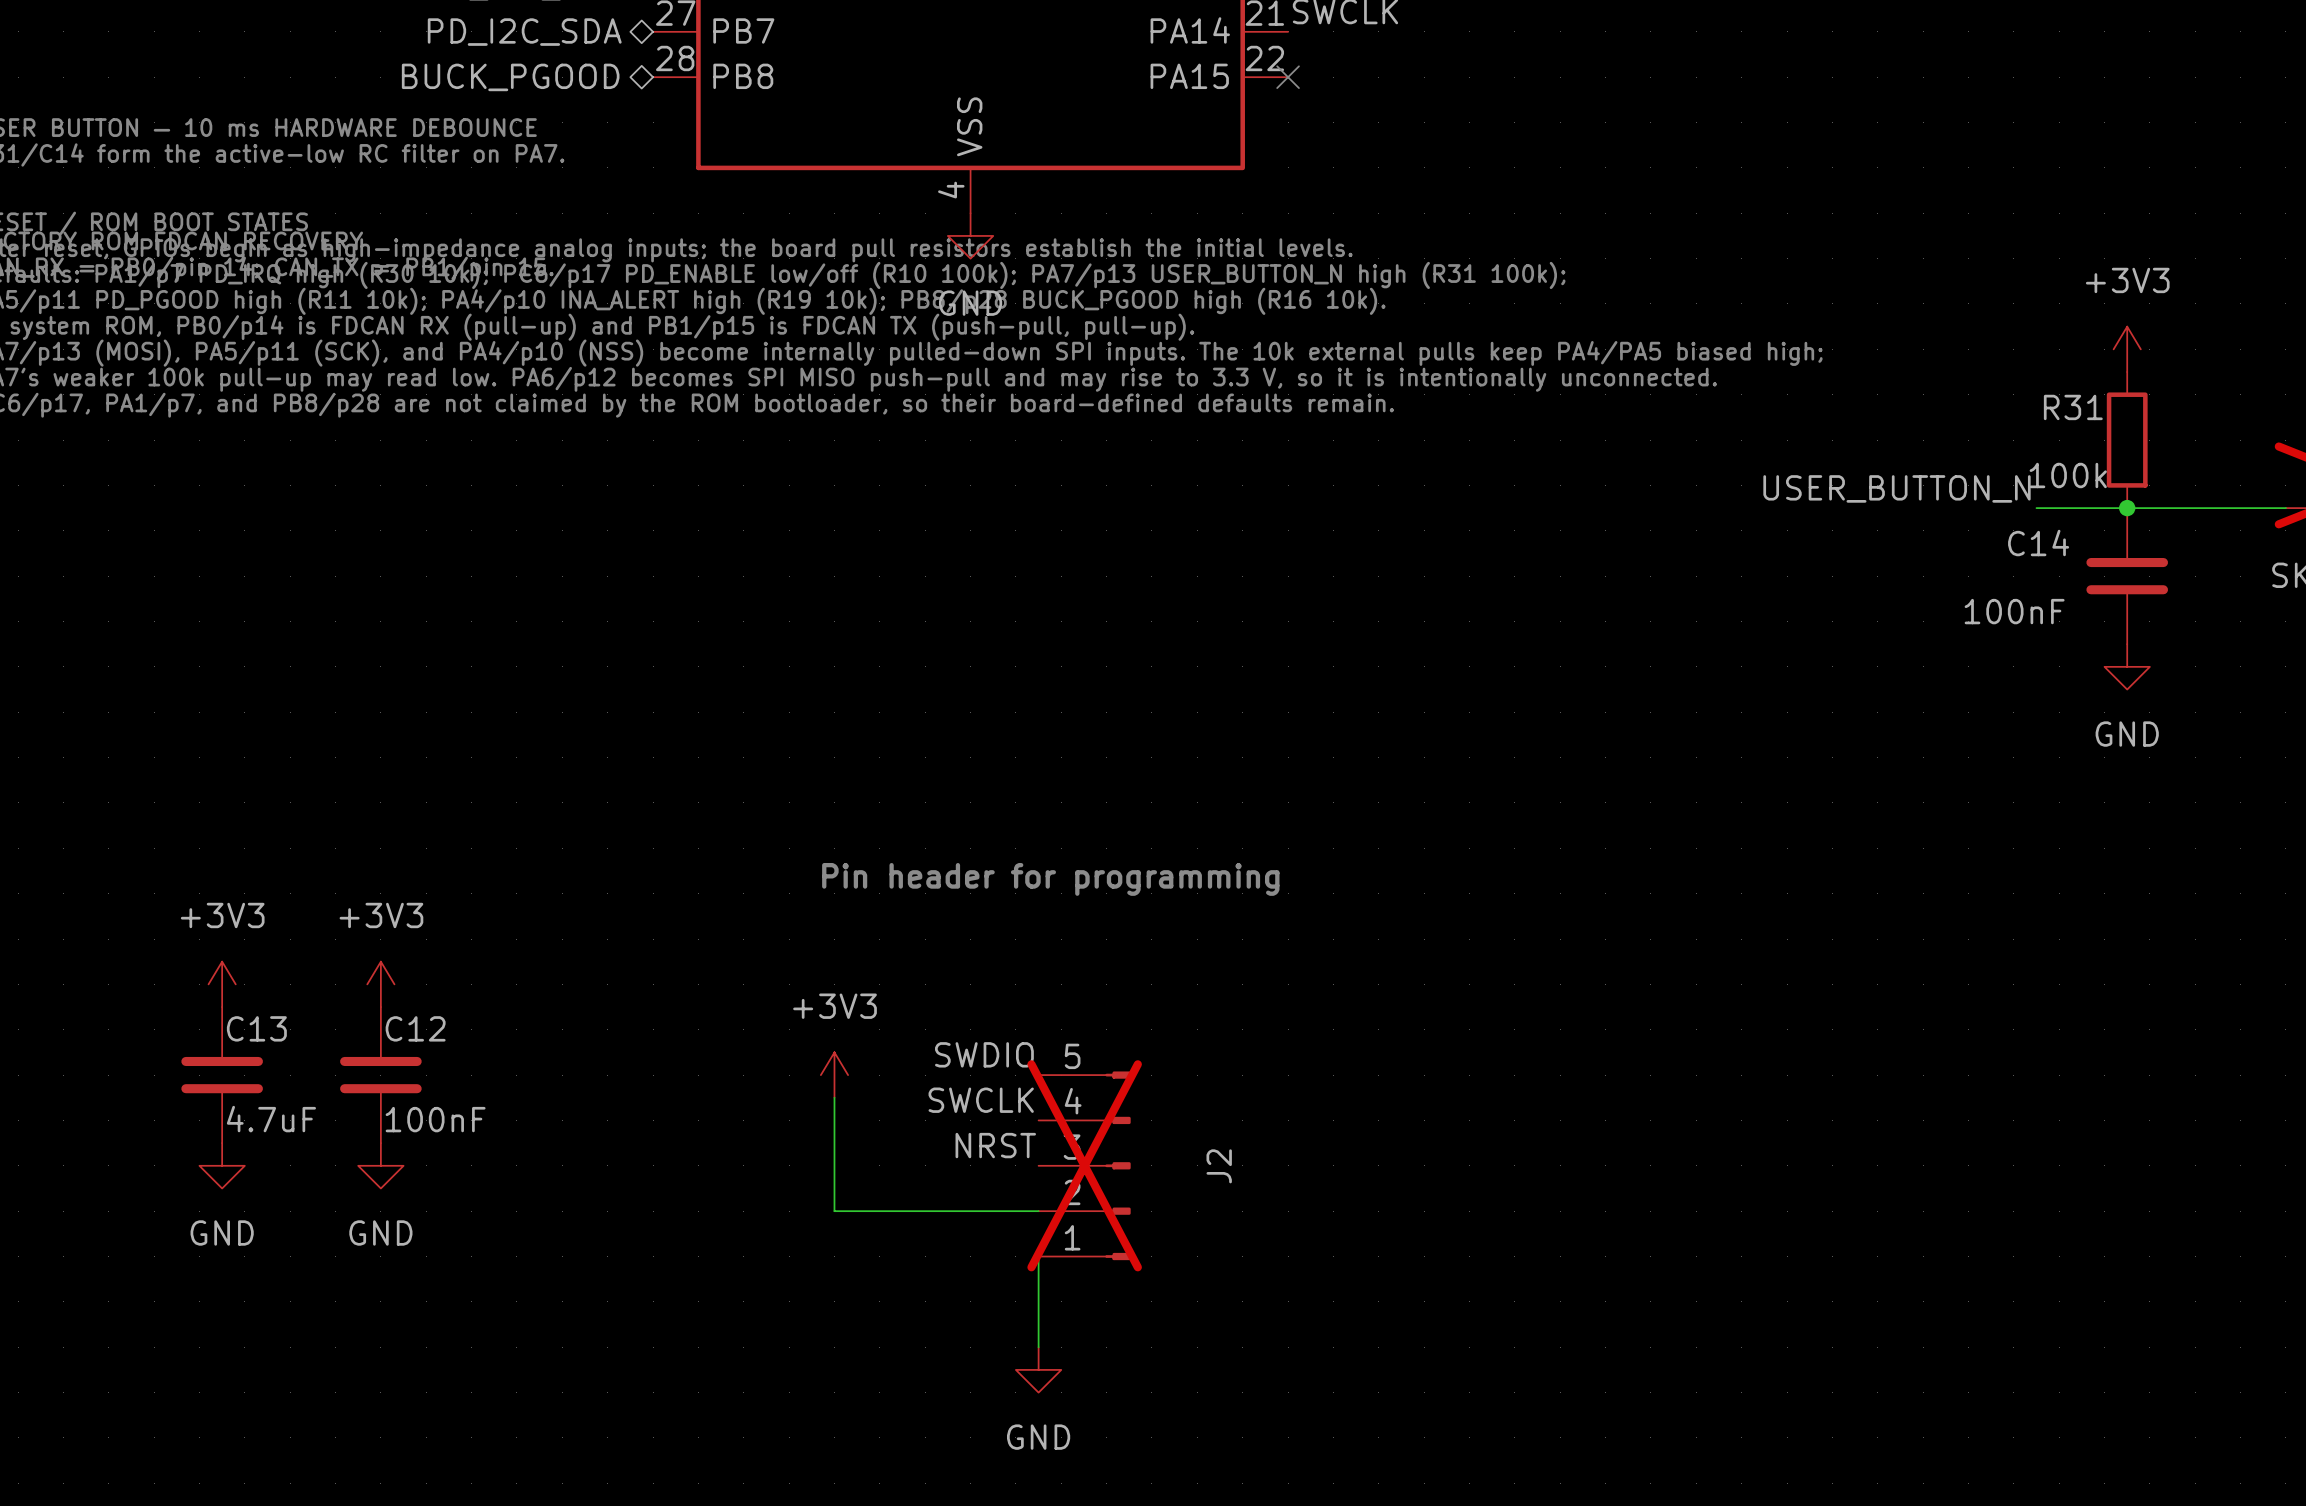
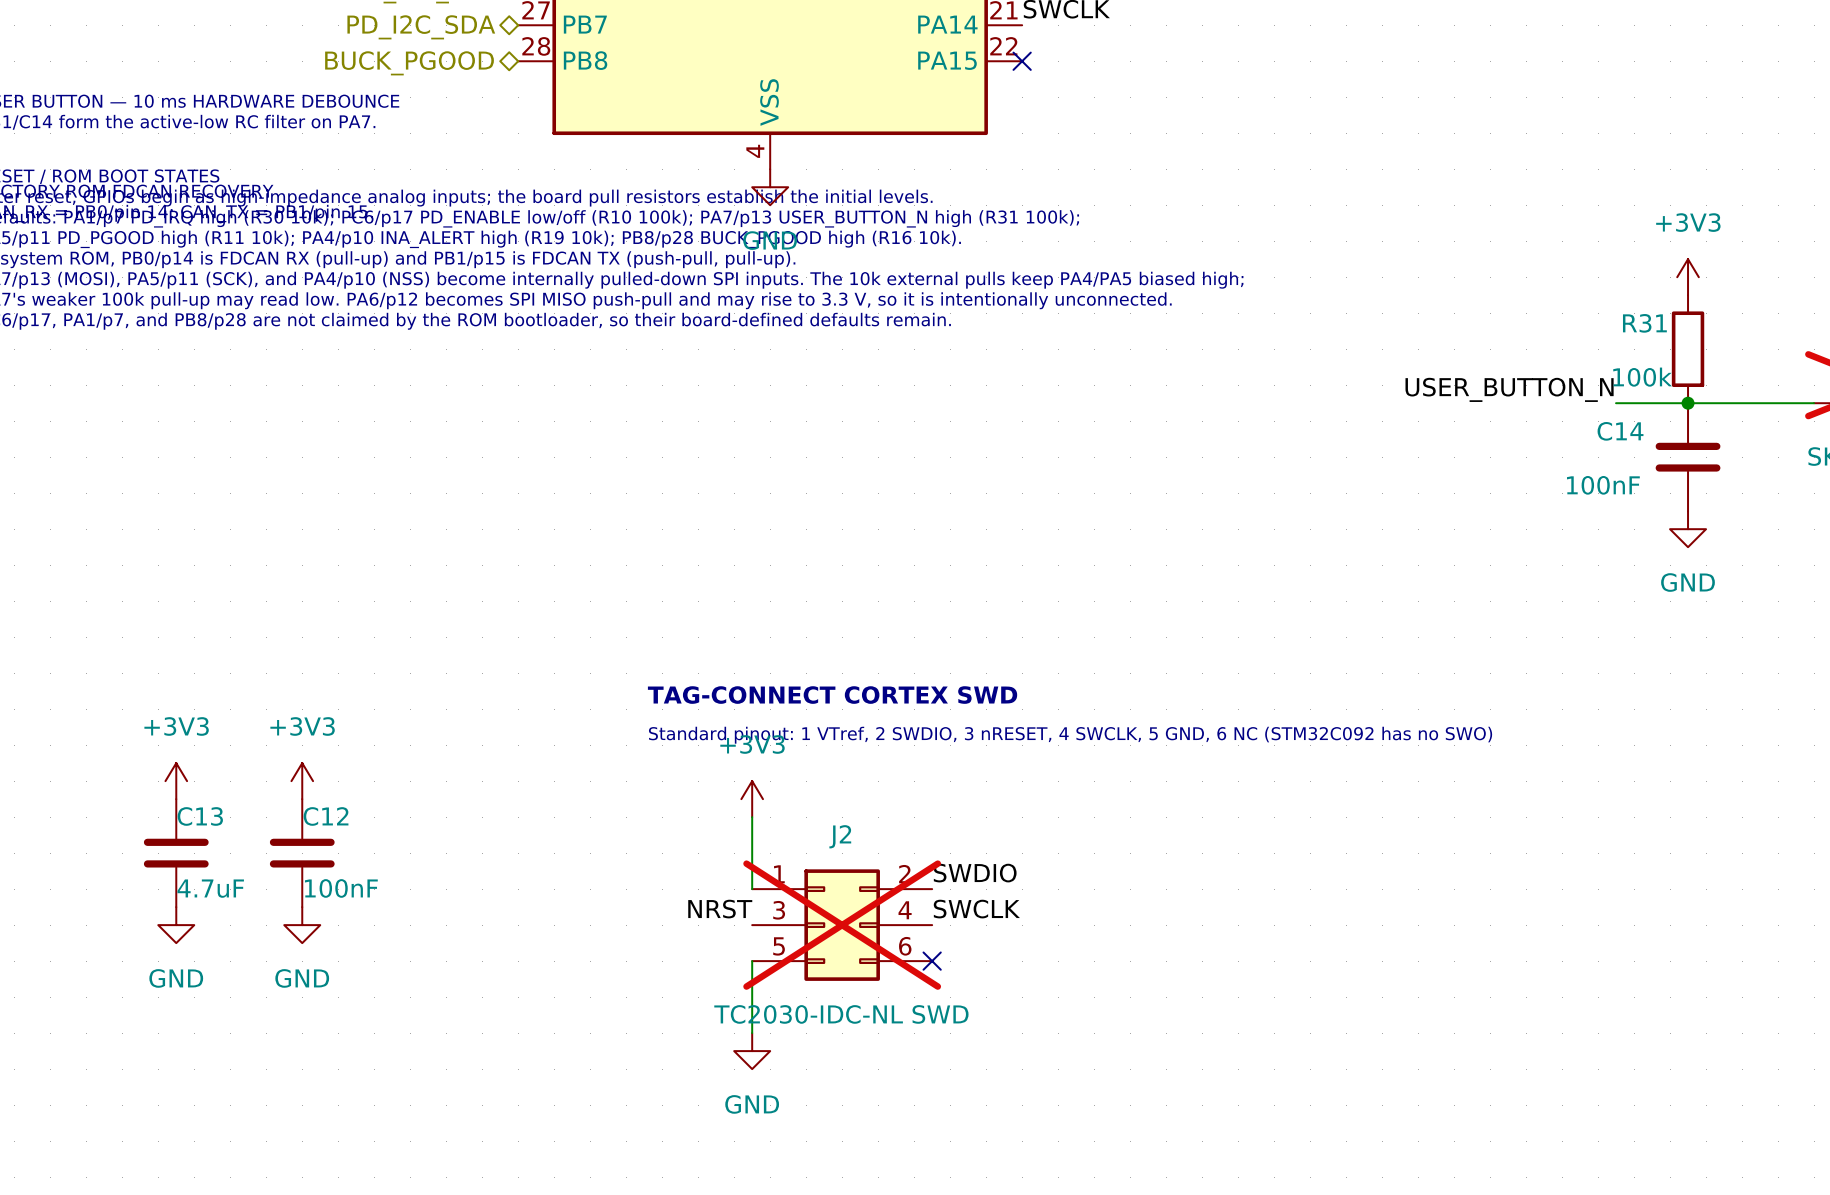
text: Pin header for programming (1050, 879) -> TAG-CONNECT CORTEX SWD (832, 695)
text: none -> Standard pinout: 1 VTref, 2 SWDIO, 3 nRESET, 4 SWCLK, 5 GND, 6 NC (STM32C092 has no SWO) (1070, 735)
wire: none -> (752, 817) (752, 889)
label position: SWDIO (984, 1054) -> SWDIO (975, 873)
J2 symbol: [1038, 1071, 1131, 1261] -> [752, 869, 933, 981]
power symbol position: +3V3 (834, 1075) -> +3V3 (752, 799)
wire: (834, 1097) (834, 1211) (1038, 1211) -> none
label position: SWCLK (981, 1100) -> SWCLK (976, 909)
label position: NRST (995, 1145) -> NRST (720, 909)
J2 name position: J2 (1219, 1166) -> J2 (840, 836)
no-connect mark: none -> (932, 961)
wire: (1038, 1256) (1038, 1347) -> (752, 961) (752, 1033)
J2 value: none -> TC2030-IDC-NL SWD (841, 1014)
power symbol position: GND (1038, 1369) -> GND (752, 1051)

